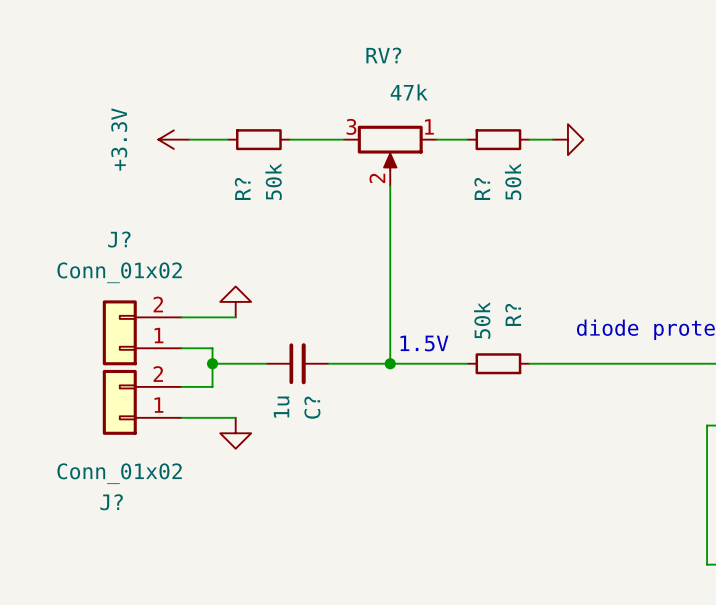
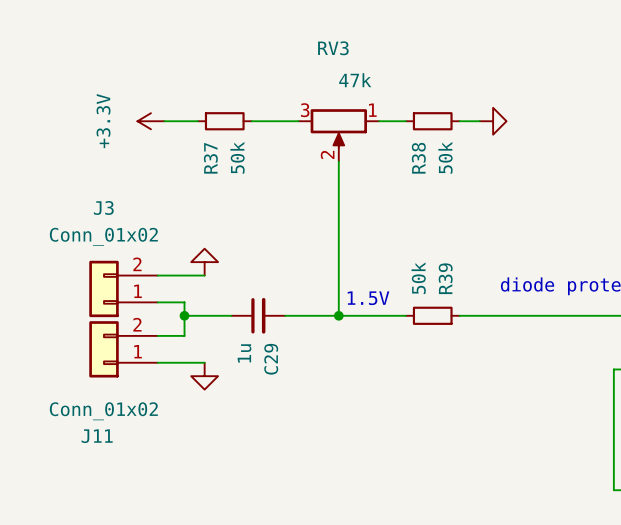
RV? name: RV? (383, 55) -> RV3 (333, 48)
R? name: R? (242, 188) -> R37 (210, 158)
R? name: R? (482, 188) -> R38 (418, 158)
J? name: J? (119, 239) -> J3 (103, 207)
R? name: R? (513, 314) -> R39 (445, 278)
C? name: C? (312, 407) -> C29 (271, 359)
J? name: J? (111, 502) -> J11 (97, 436)

